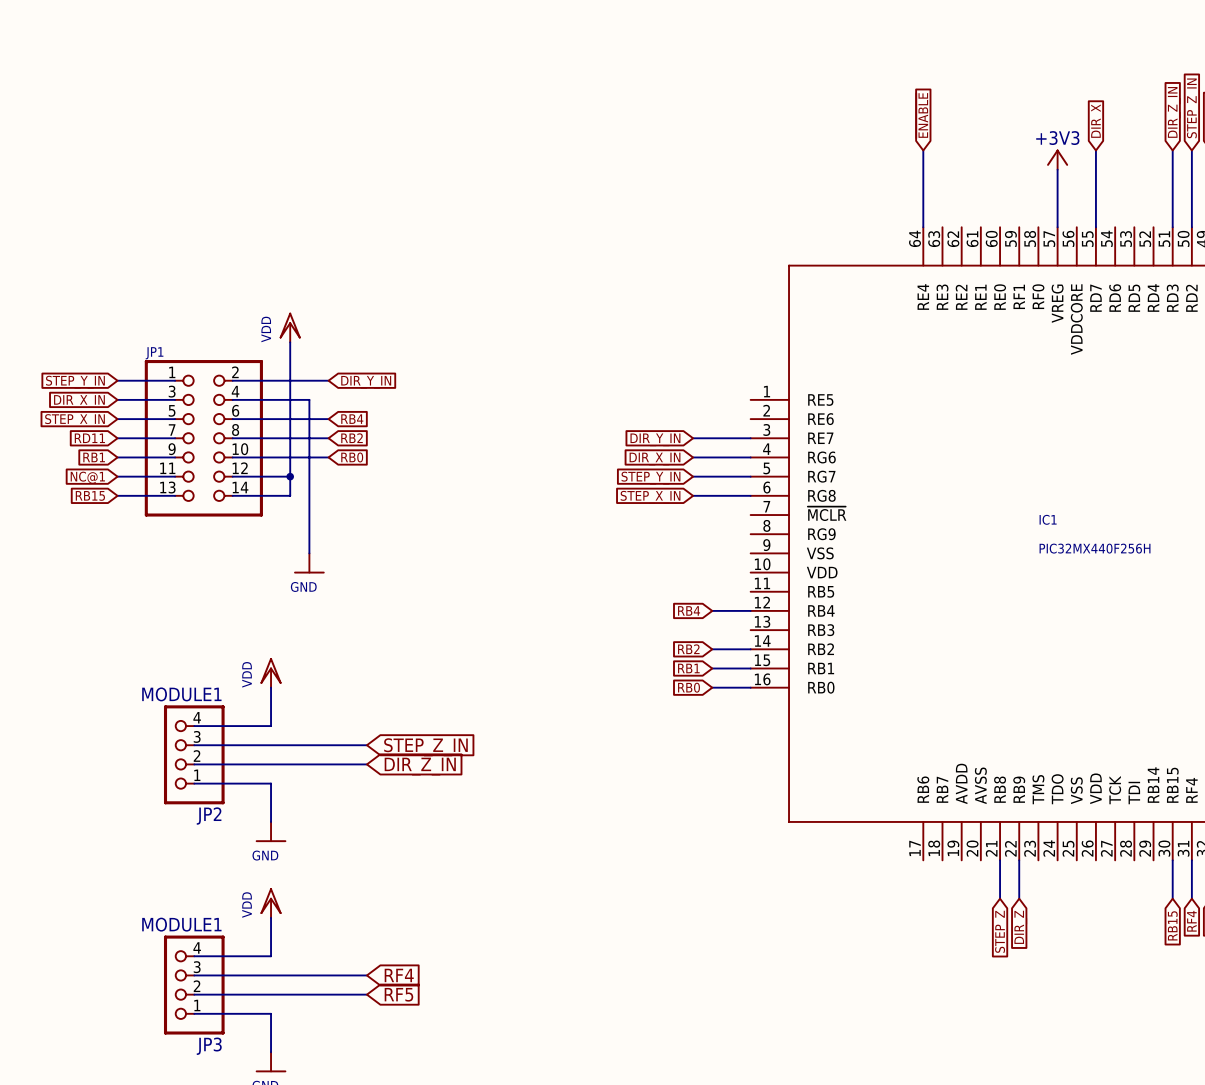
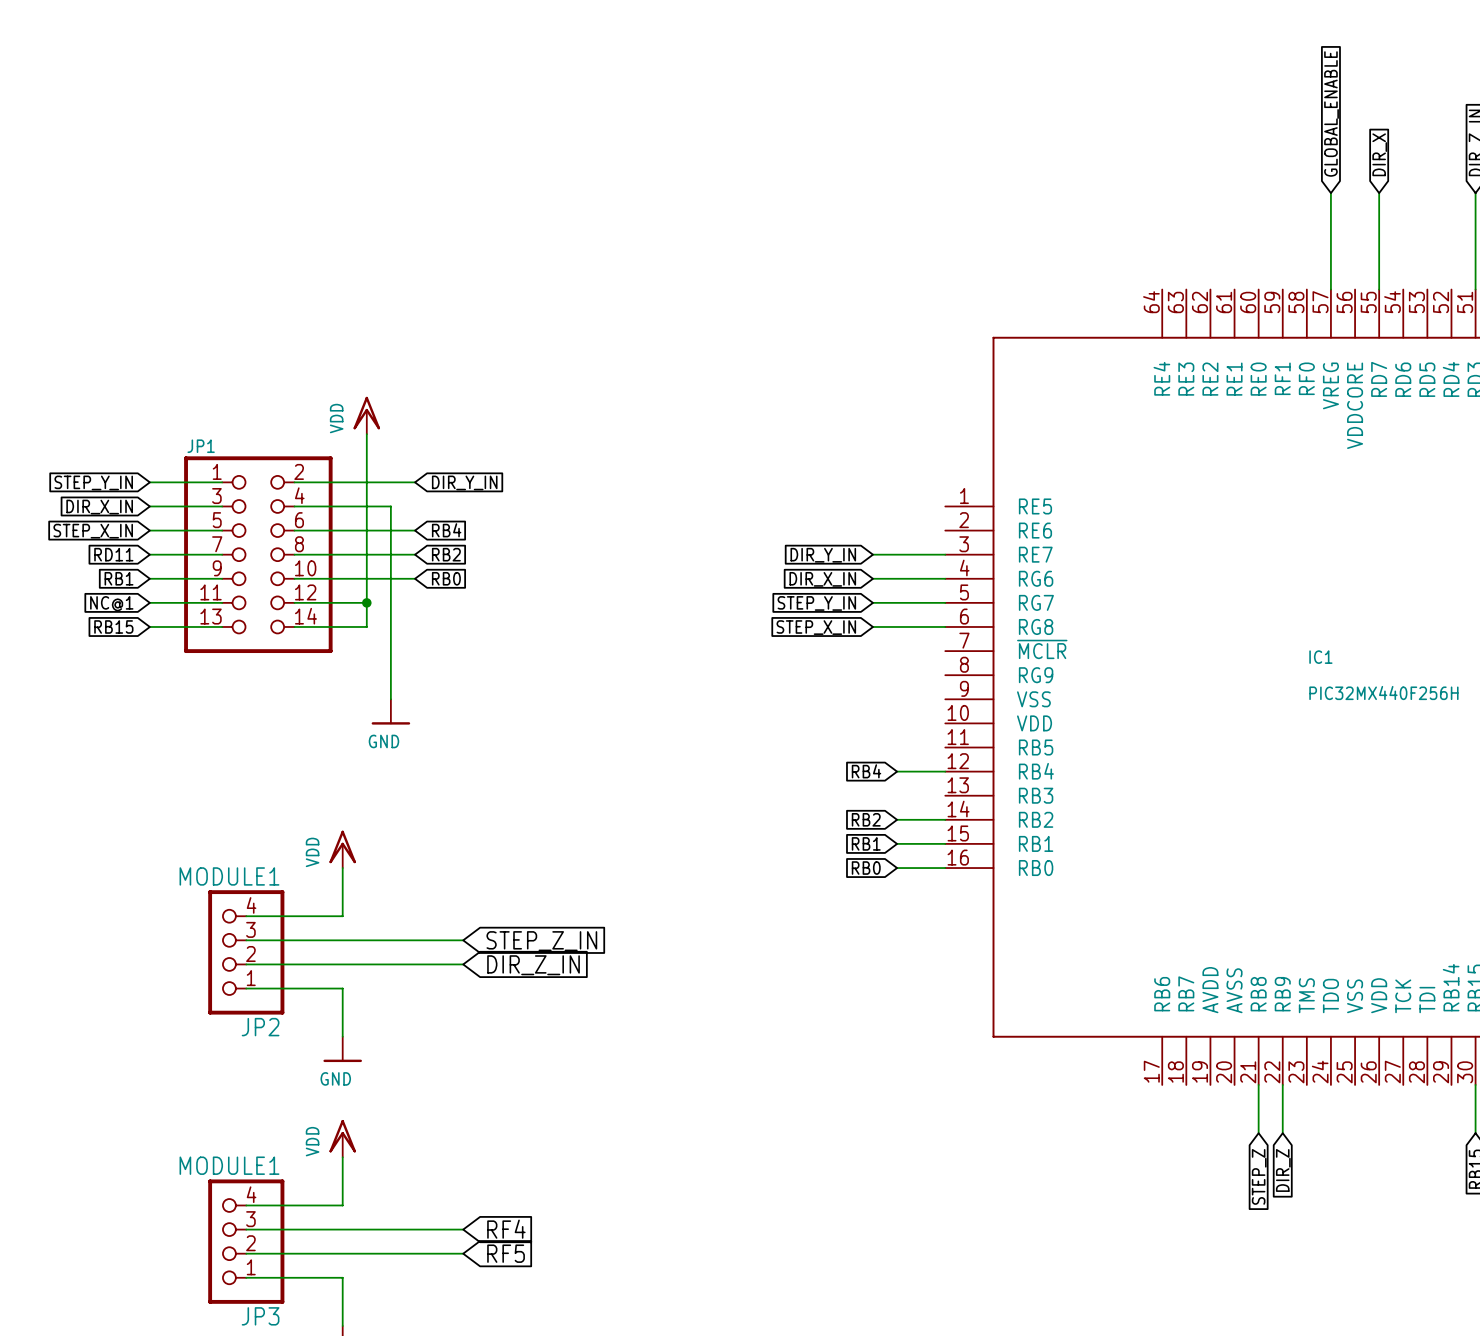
global label: none -> GLOBAL_ENABLE (1331, 113)
global label: ~{ENABLE} (922, 115) -> none
wire: (923, 150) (923, 227) -> none
power symbol: +3V3 (1057, 159) -> none

